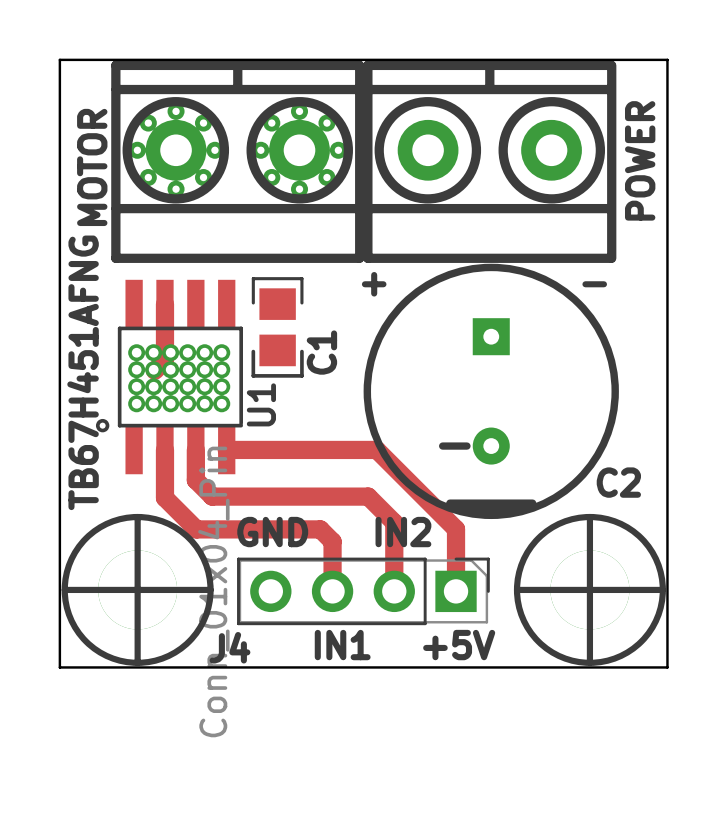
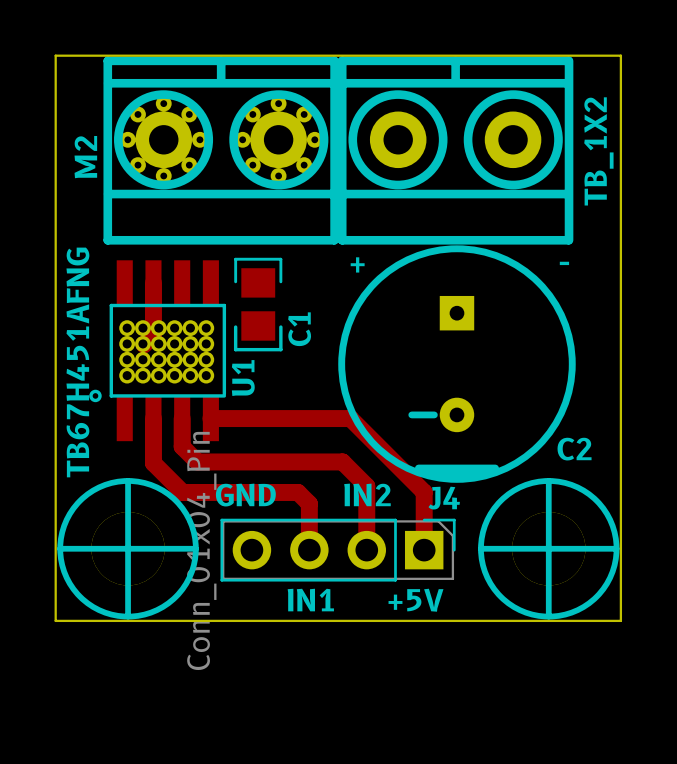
part value: POWER (640, 160) -> TB_1X2 (598, 151)
part value: MOTOR (92, 167) -> M2 (85, 157)
J4 name position: J4 (230, 647) -> J4 (444, 498)

